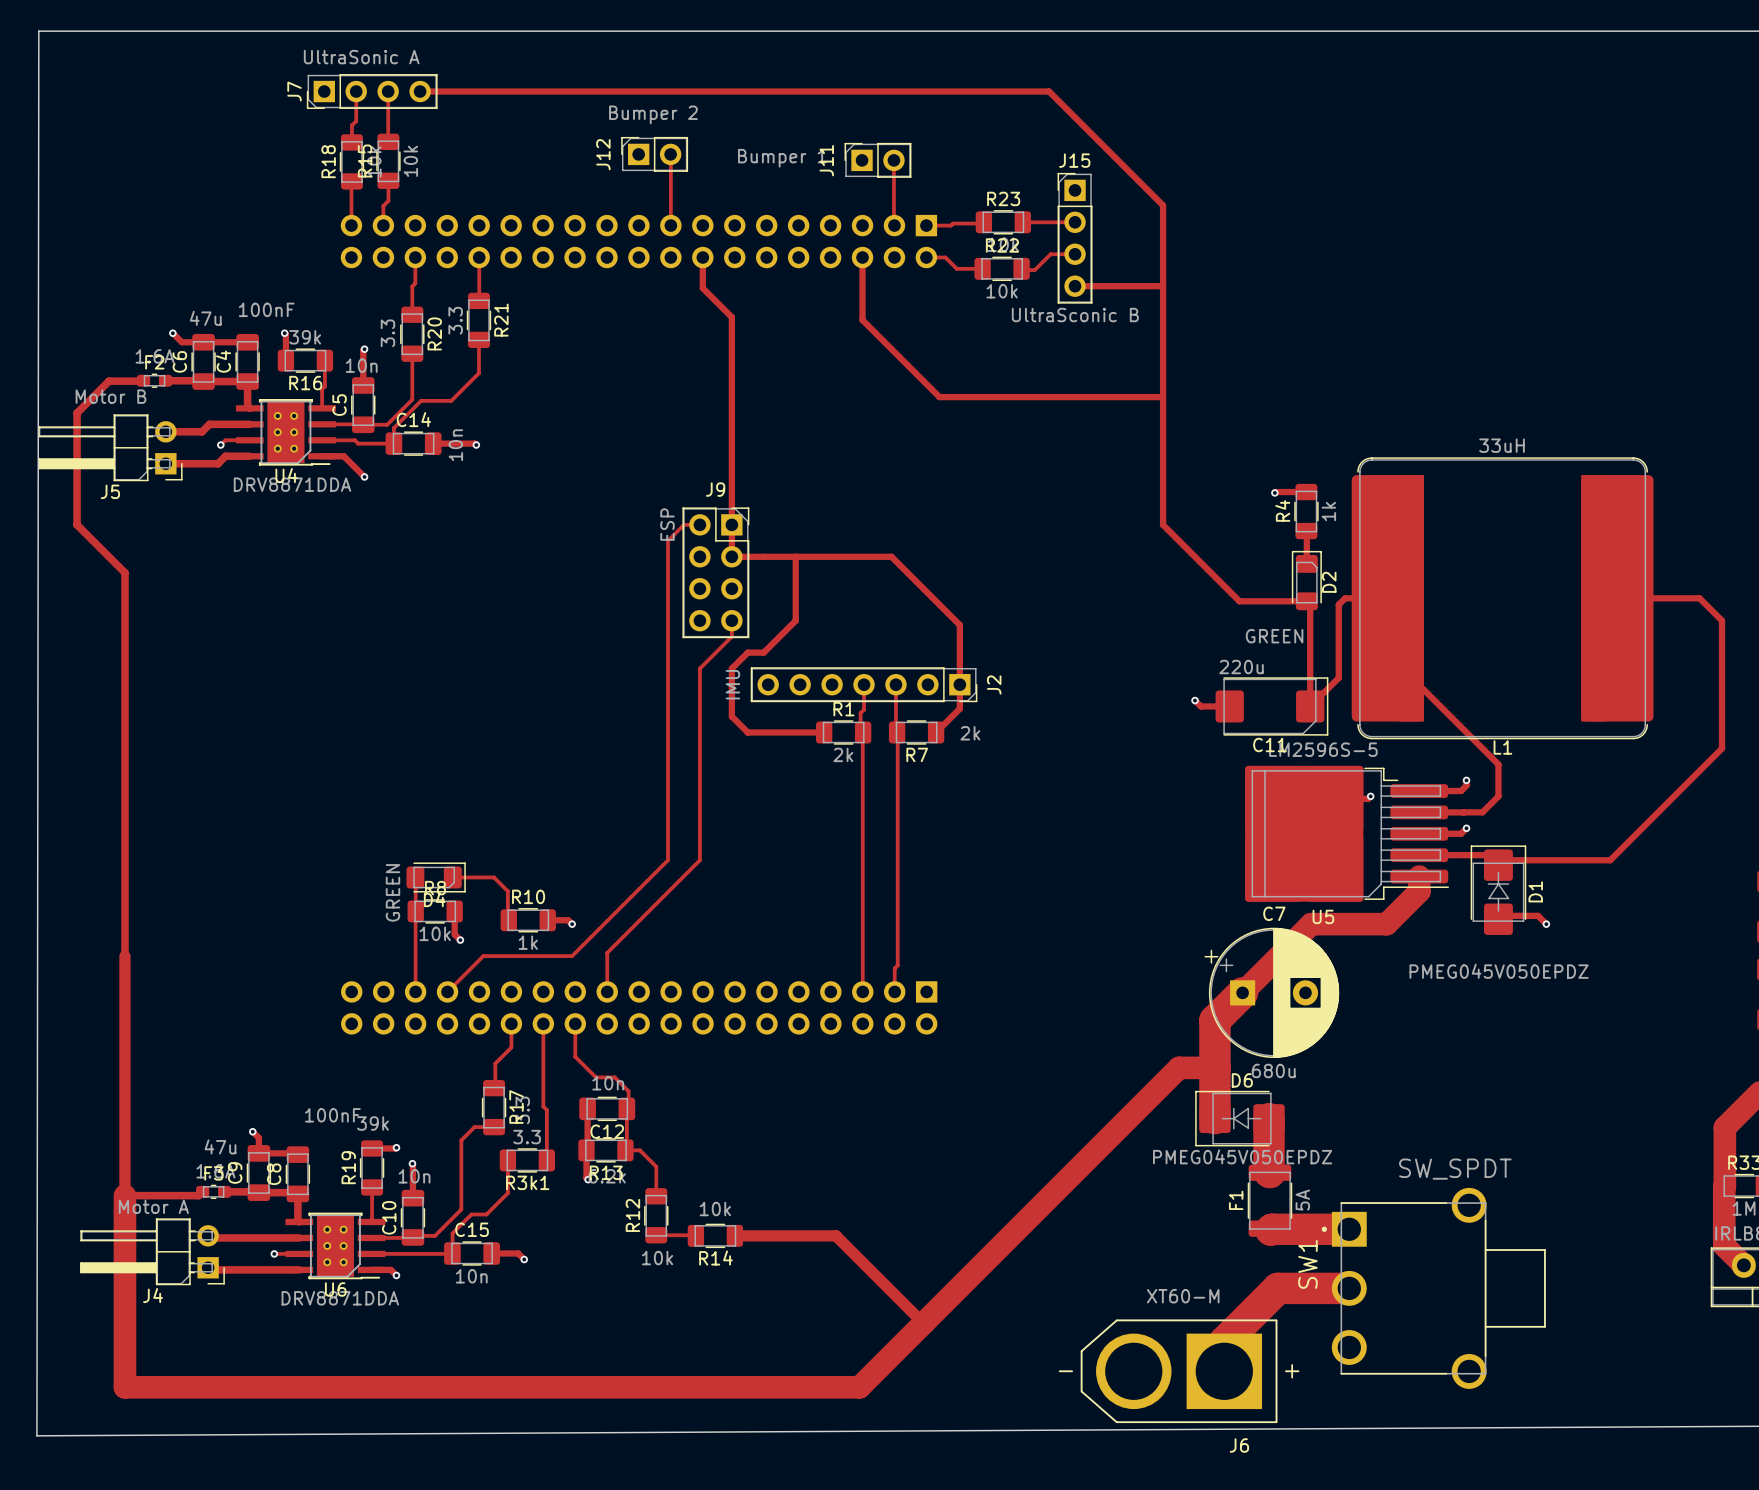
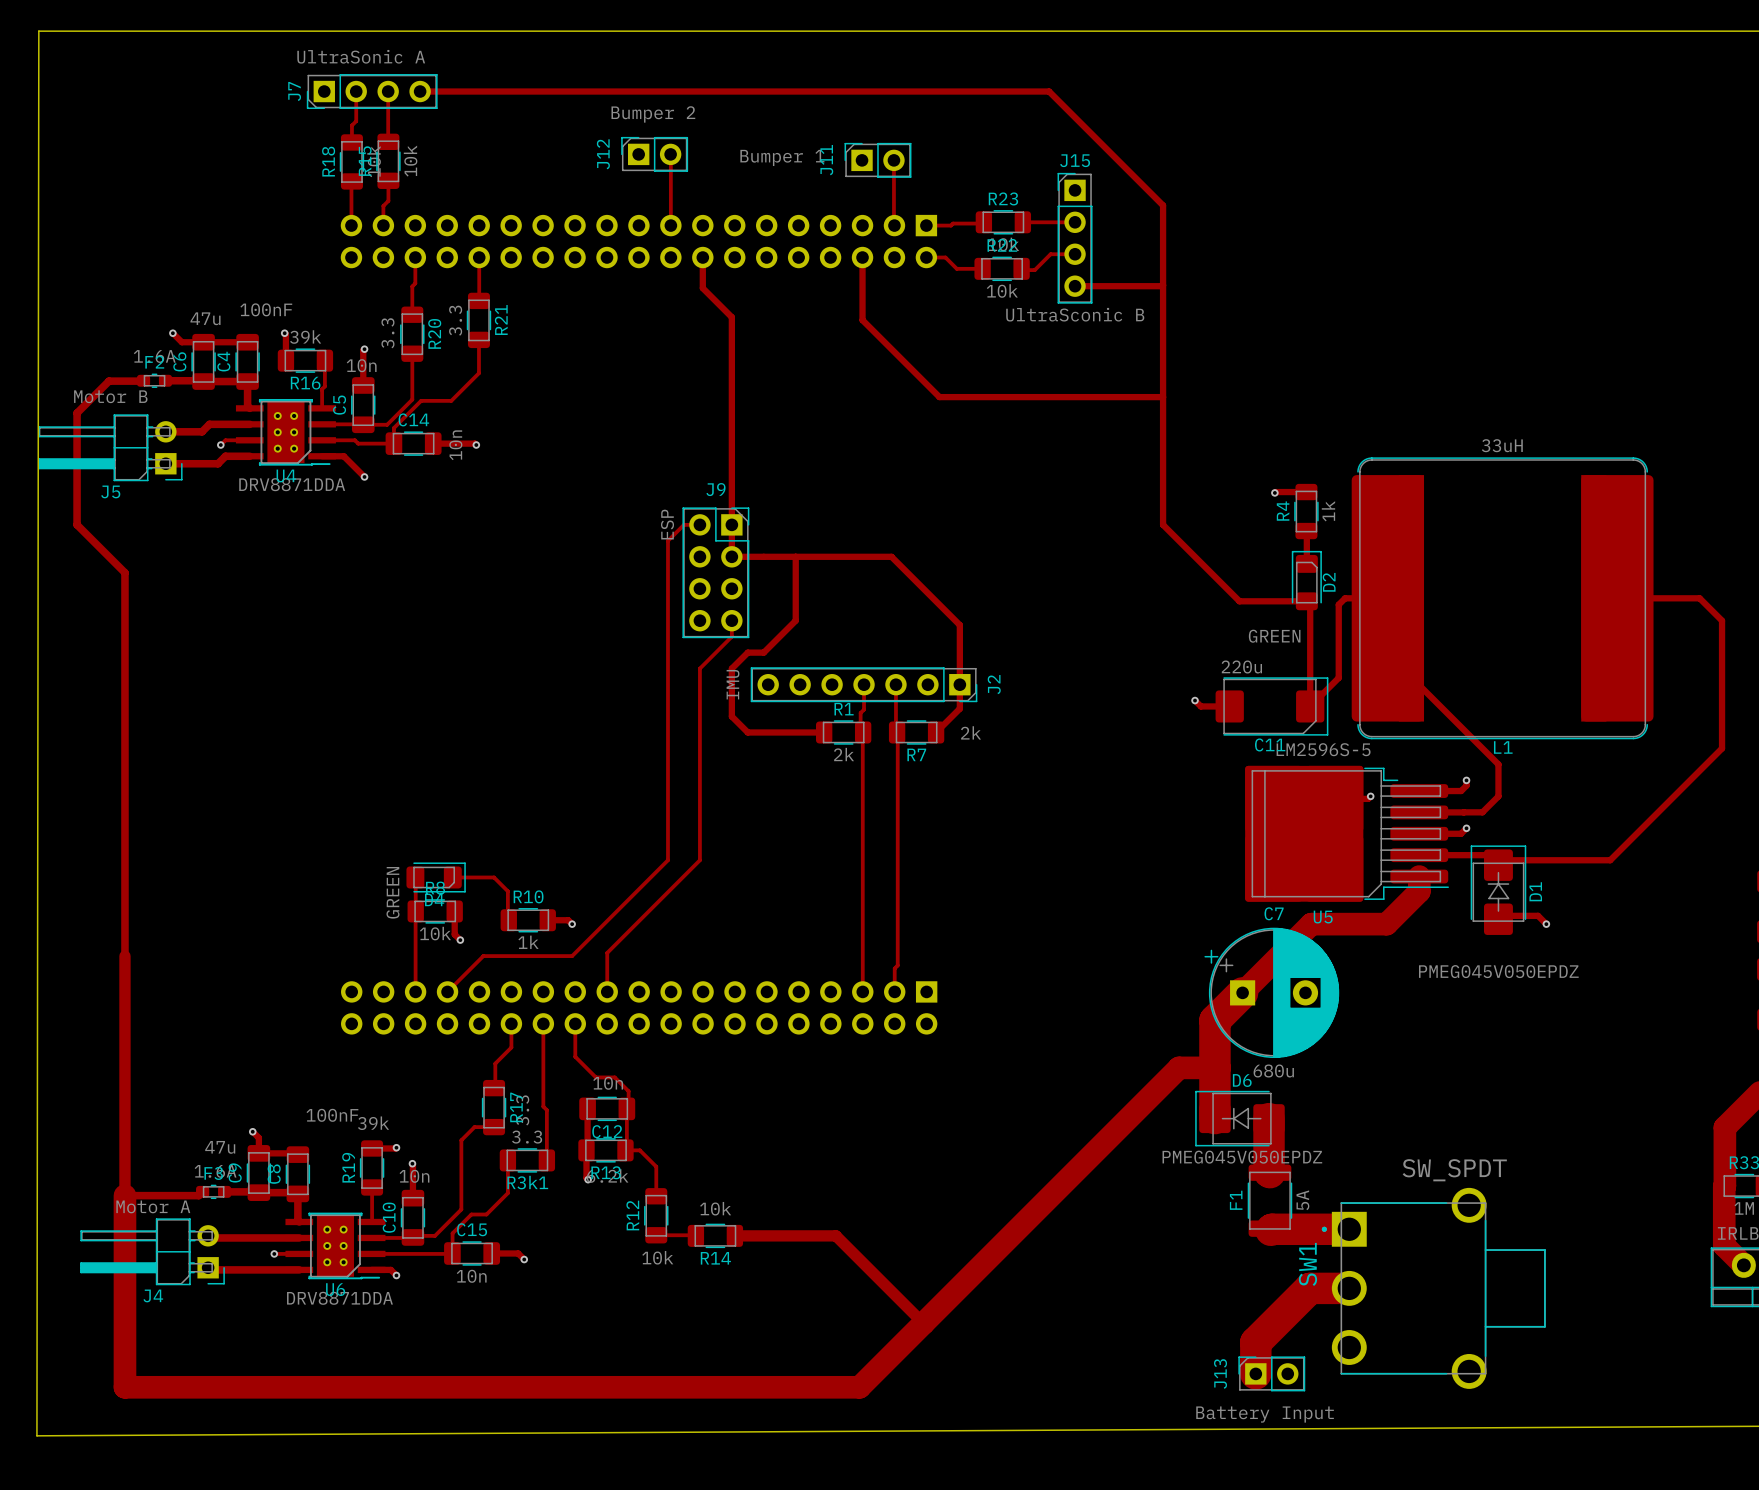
track: (1309, 1288) (1277, 1288) (1224, 1342) (1224, 1371) -> (1309, 1288) (1255, 1342) (1255, 1373)
J6: XT60-M (1179, 1371) -> none
J13: none -> Battery Input (1271, 1373)

